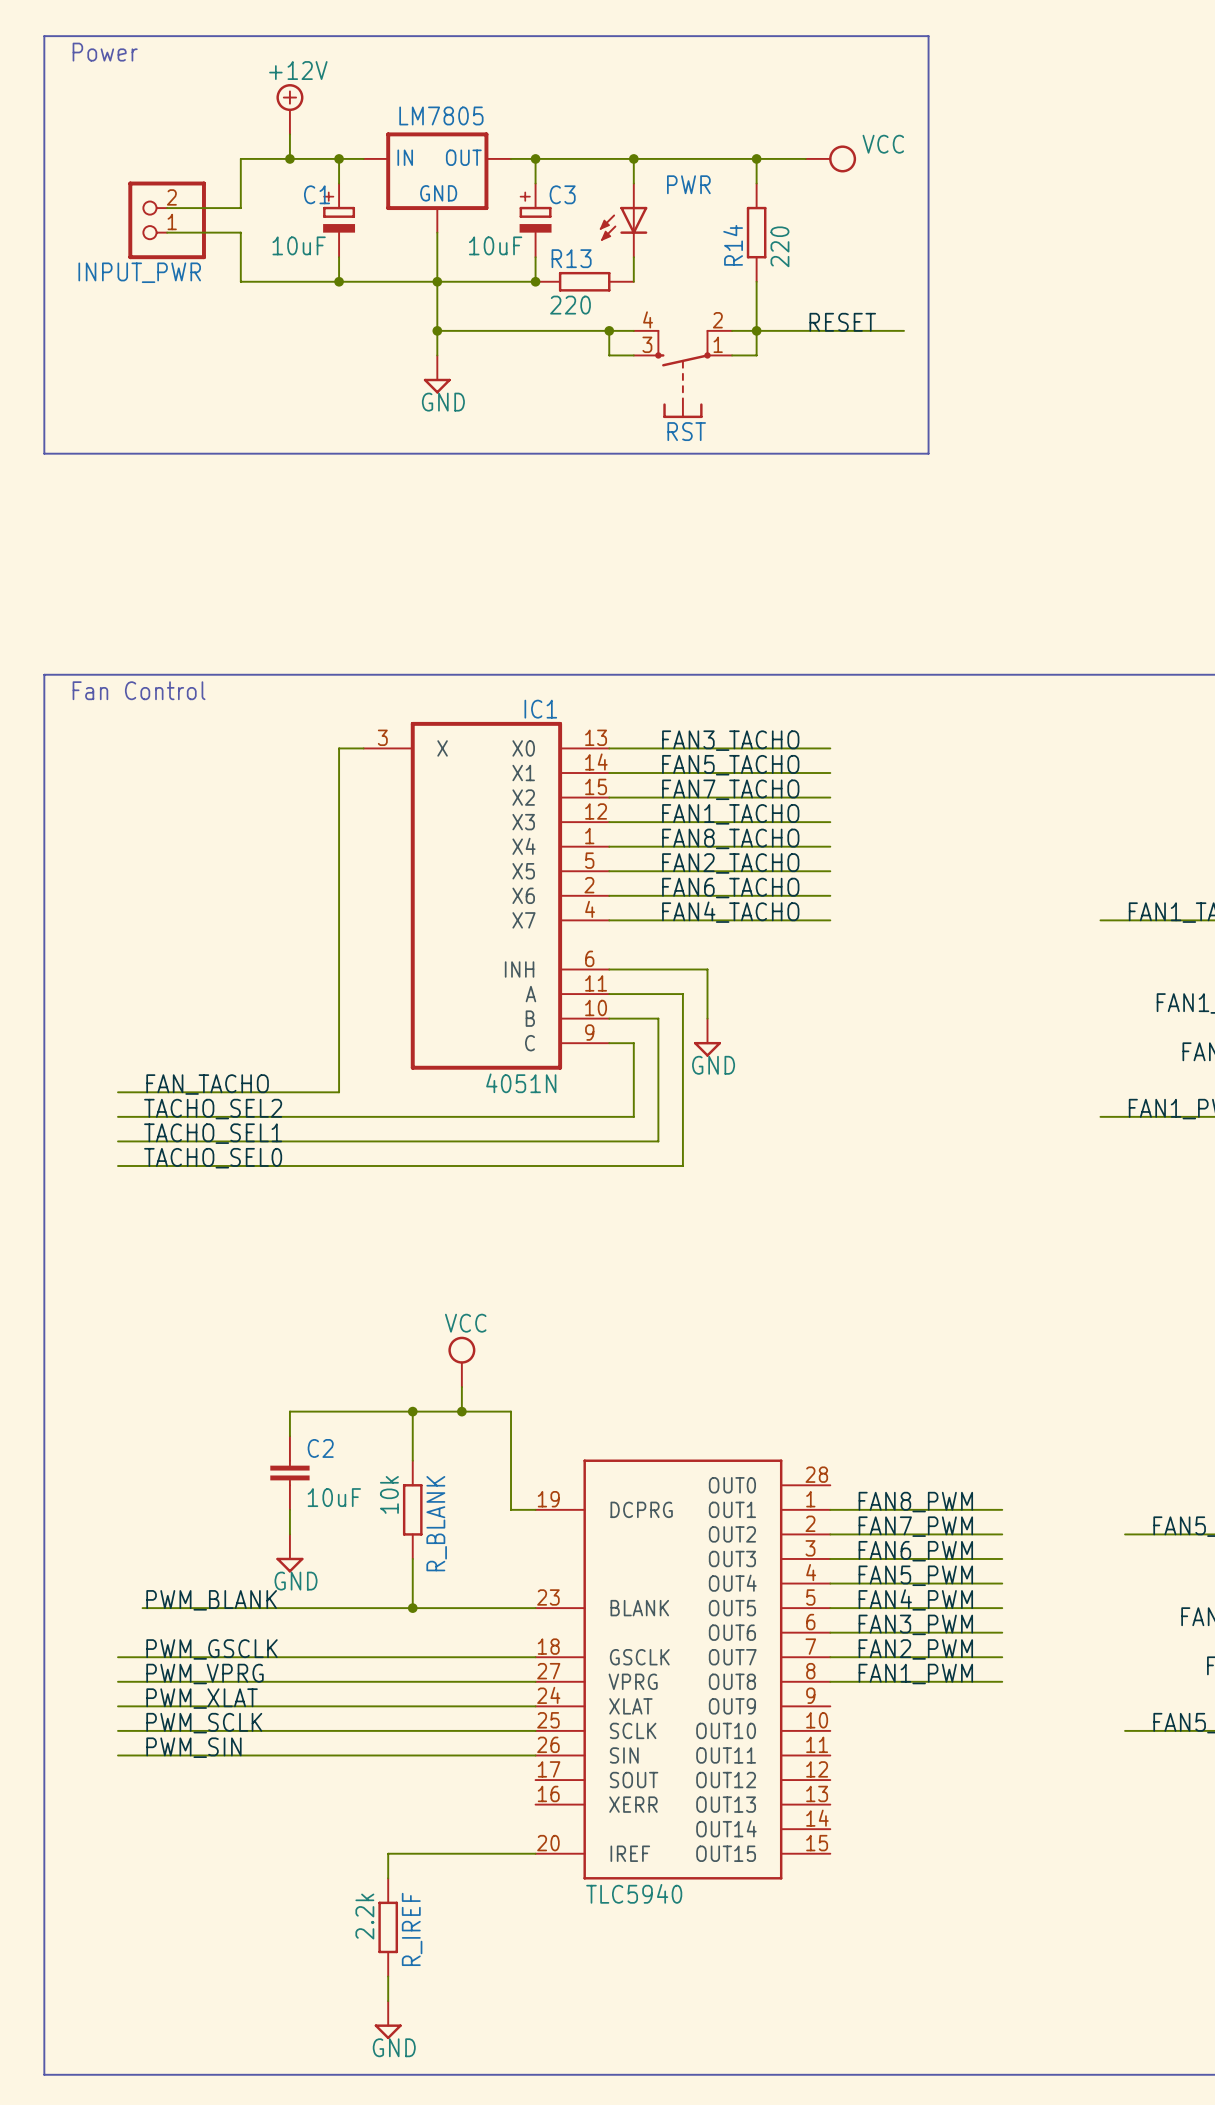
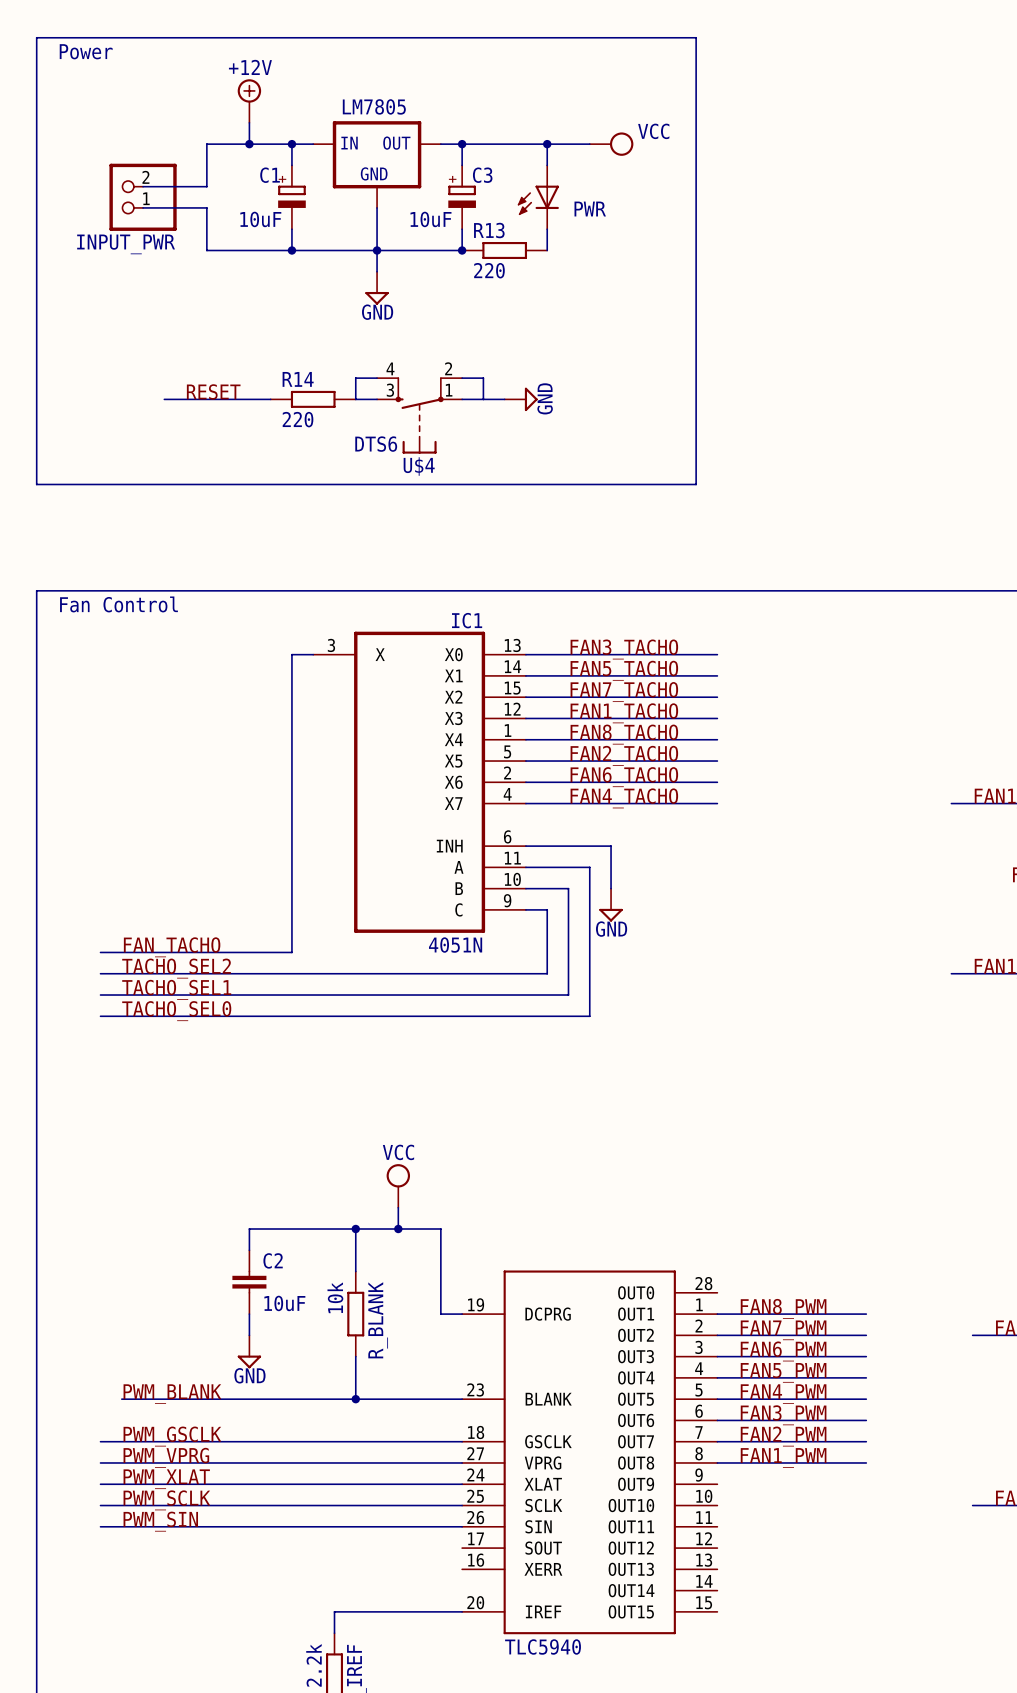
line: (805, 36) (928, 36) (928, 453) (44, 453) -> (696, 37) (696, 484) (36, 484) (36, 399)
wire: (682, 158) (805, 158) -> none
wire: (756, 158) (756, 183) -> none
junction: (756, 158) -> none
power symbol position: VCC (830, 158) -> VCC (611, 144)
PWR name position: PWR (688, 184) -> PWR (590, 209)
R14 rotation: 0° (756, 232) -> 90° clockwise (313, 399)
R14 position: (756, 232) -> (313, 399)
wire: (756, 281) (756, 355) (732, 355) -> none
label: RESET (842, 322) -> none
wire: (437, 330) (633, 330) -> none
junction: (437, 330) -> none
wire: (609, 330) (609, 355) (633, 355) -> none
junction: (609, 330) -> none
wire: (732, 330) (903, 330) -> none
junction: (756, 330) -> none
power symbol position: GND (437, 374) -> GND (377, 288)
RST: (682, 374) -> none
wire: none -> (377, 378) (355, 378) (355, 399) (377, 399)
wire: none -> (462, 378) (483, 378) (483, 399)
label: none -> RESET (213, 391)
power symbol: none -> GND (521, 399)
U$4: none -> DTS6 (419, 415)

